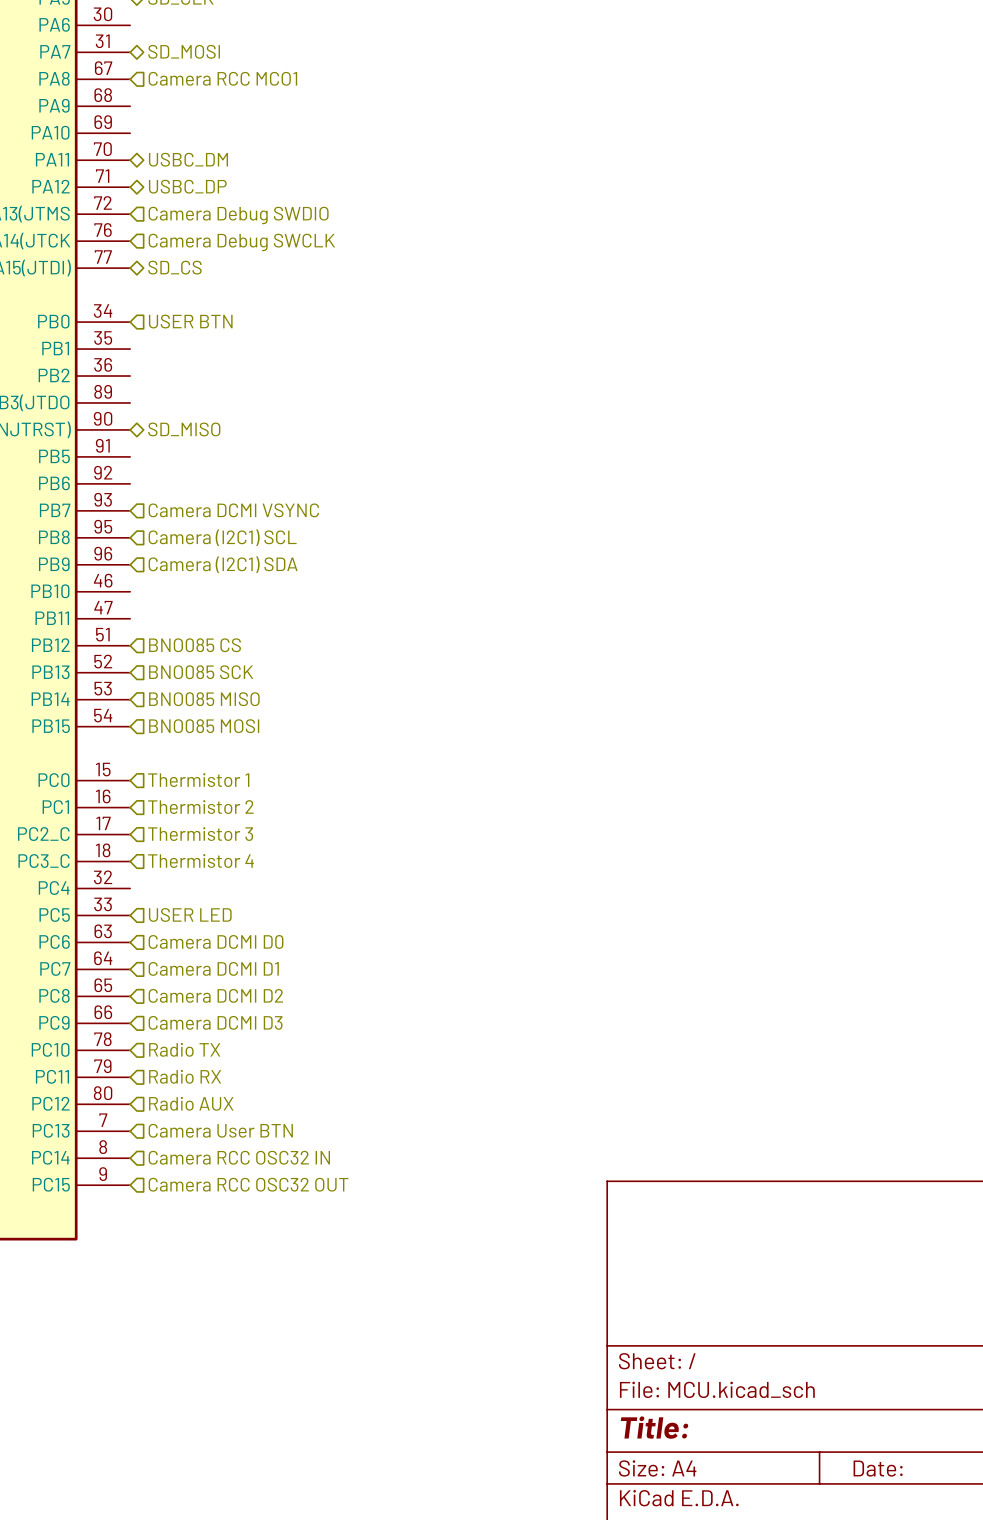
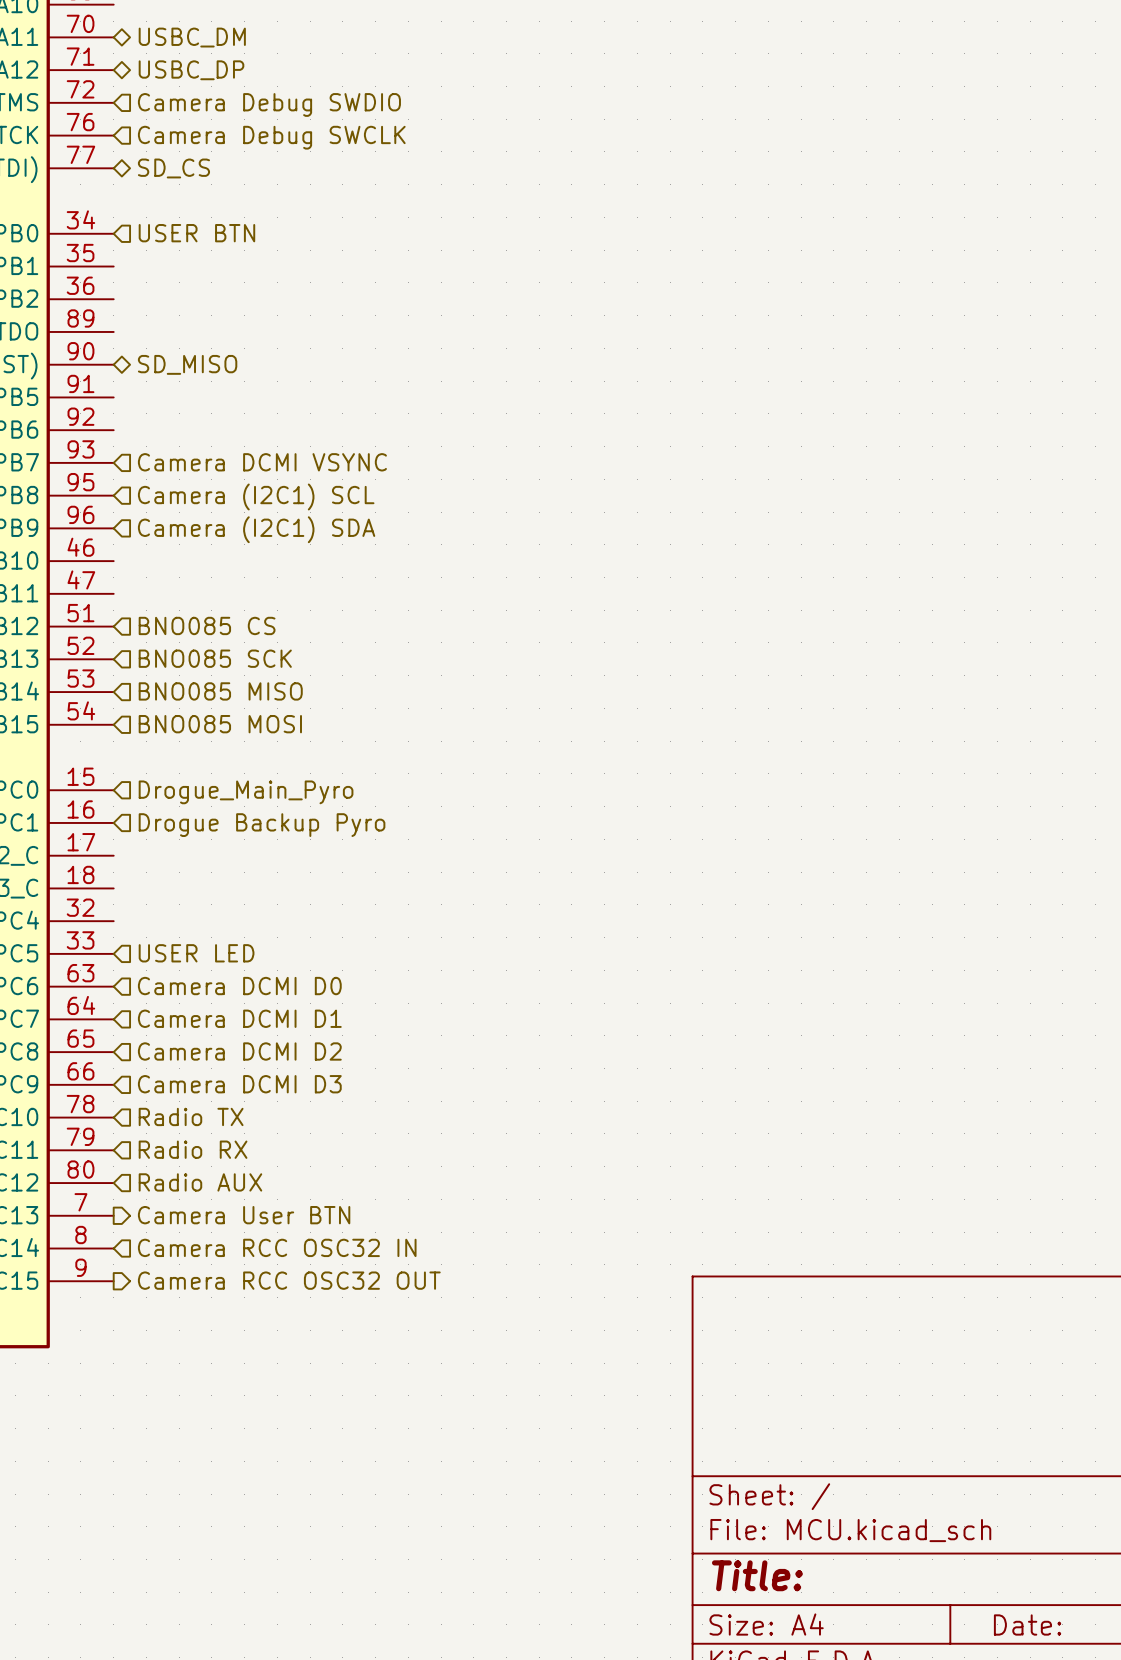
hierarchical label: Thermistor 1 (198, 780) -> Drogue_Main_Pyro (246, 792)
hierarchical label: Thermistor 2 (200, 807) -> Drogue Backup Pyro (262, 825)
hierarchical label: Thermistor 3 (200, 834) -> none
hierarchical label: Thermistor 4 (200, 861) -> none
hierarchical label shape: input (220, 1130) -> output (244, 1215)
hierarchical label shape: input (248, 1184) -> output (289, 1280)

